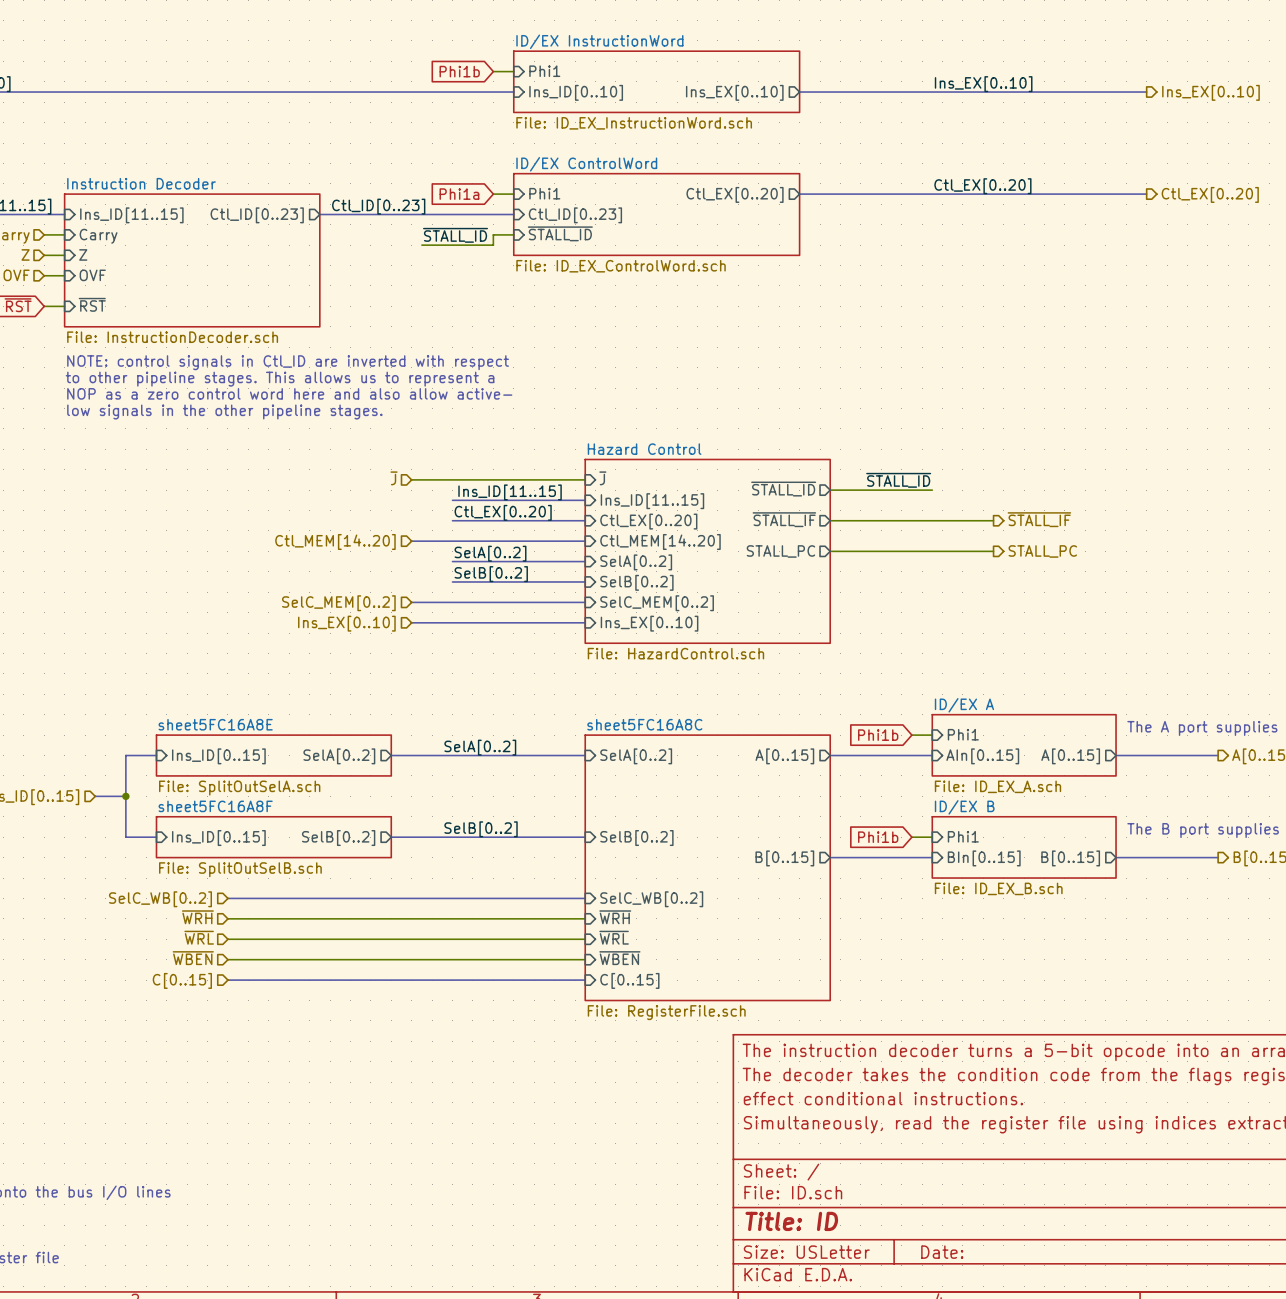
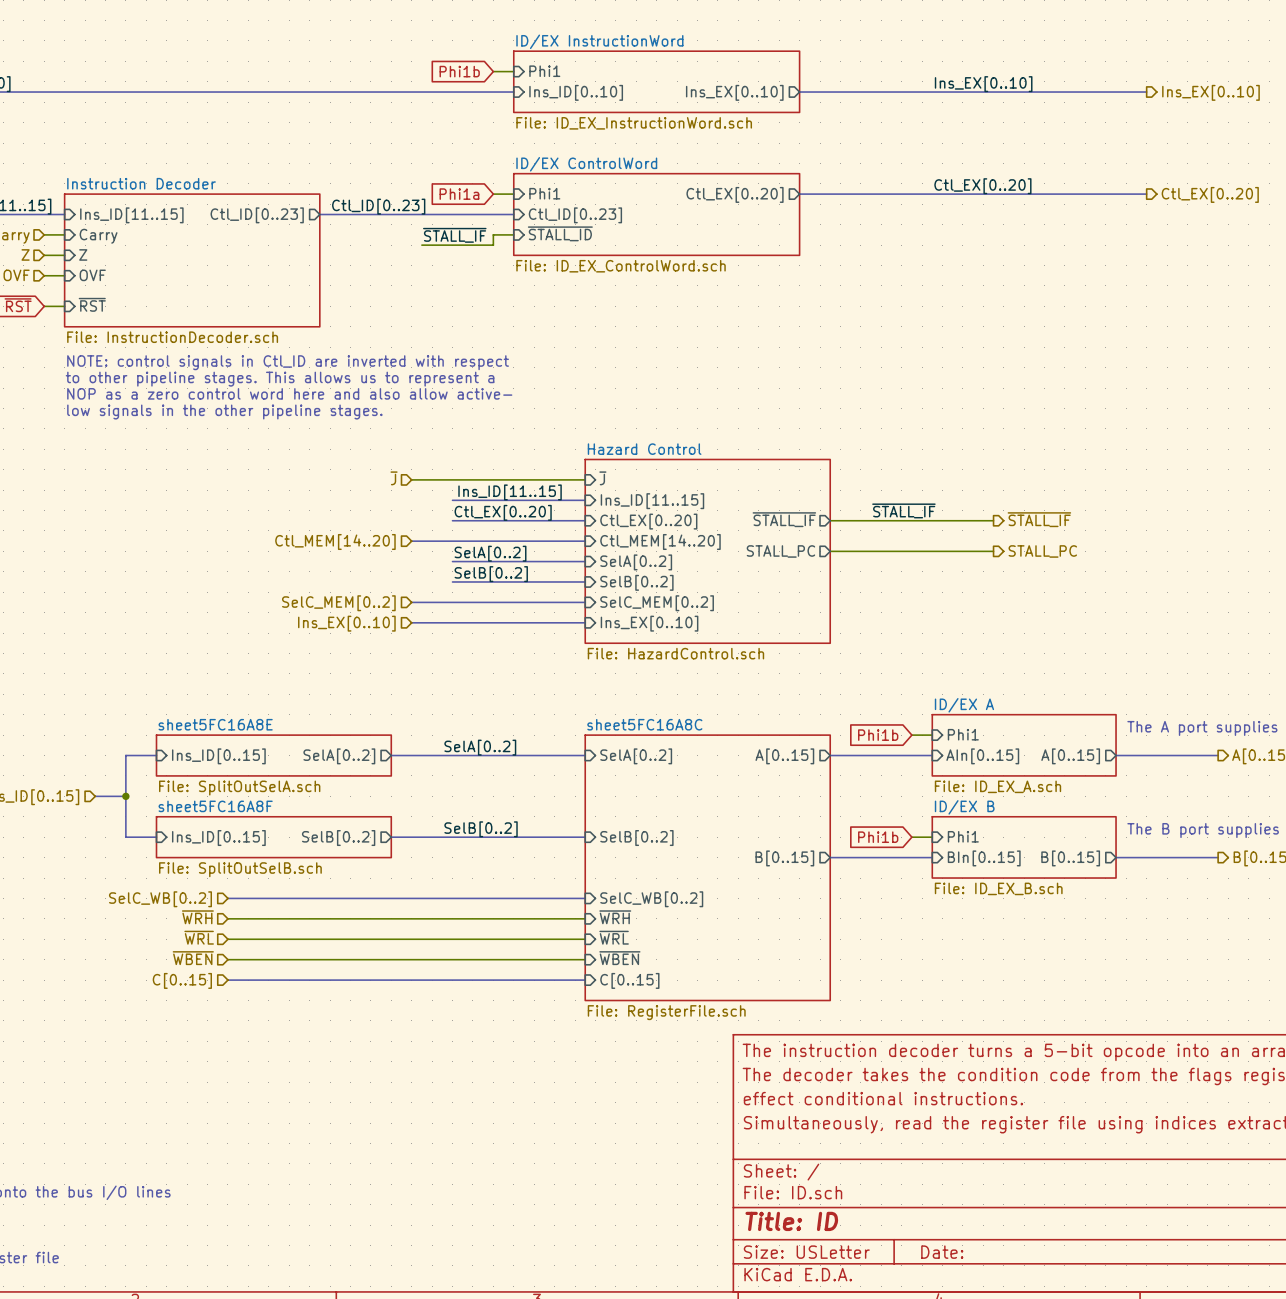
label: ~{STALL_ID} (455, 235) -> ~{STALL_IF} (454, 235)
label: ~{STALL_ID} (898, 480) -> none
sheet pin: ~{STALL_ID} (783, 489) -> none
wire: (830, 490) (932, 490) -> none
label: none -> ~{STALL_IF} (903, 510)

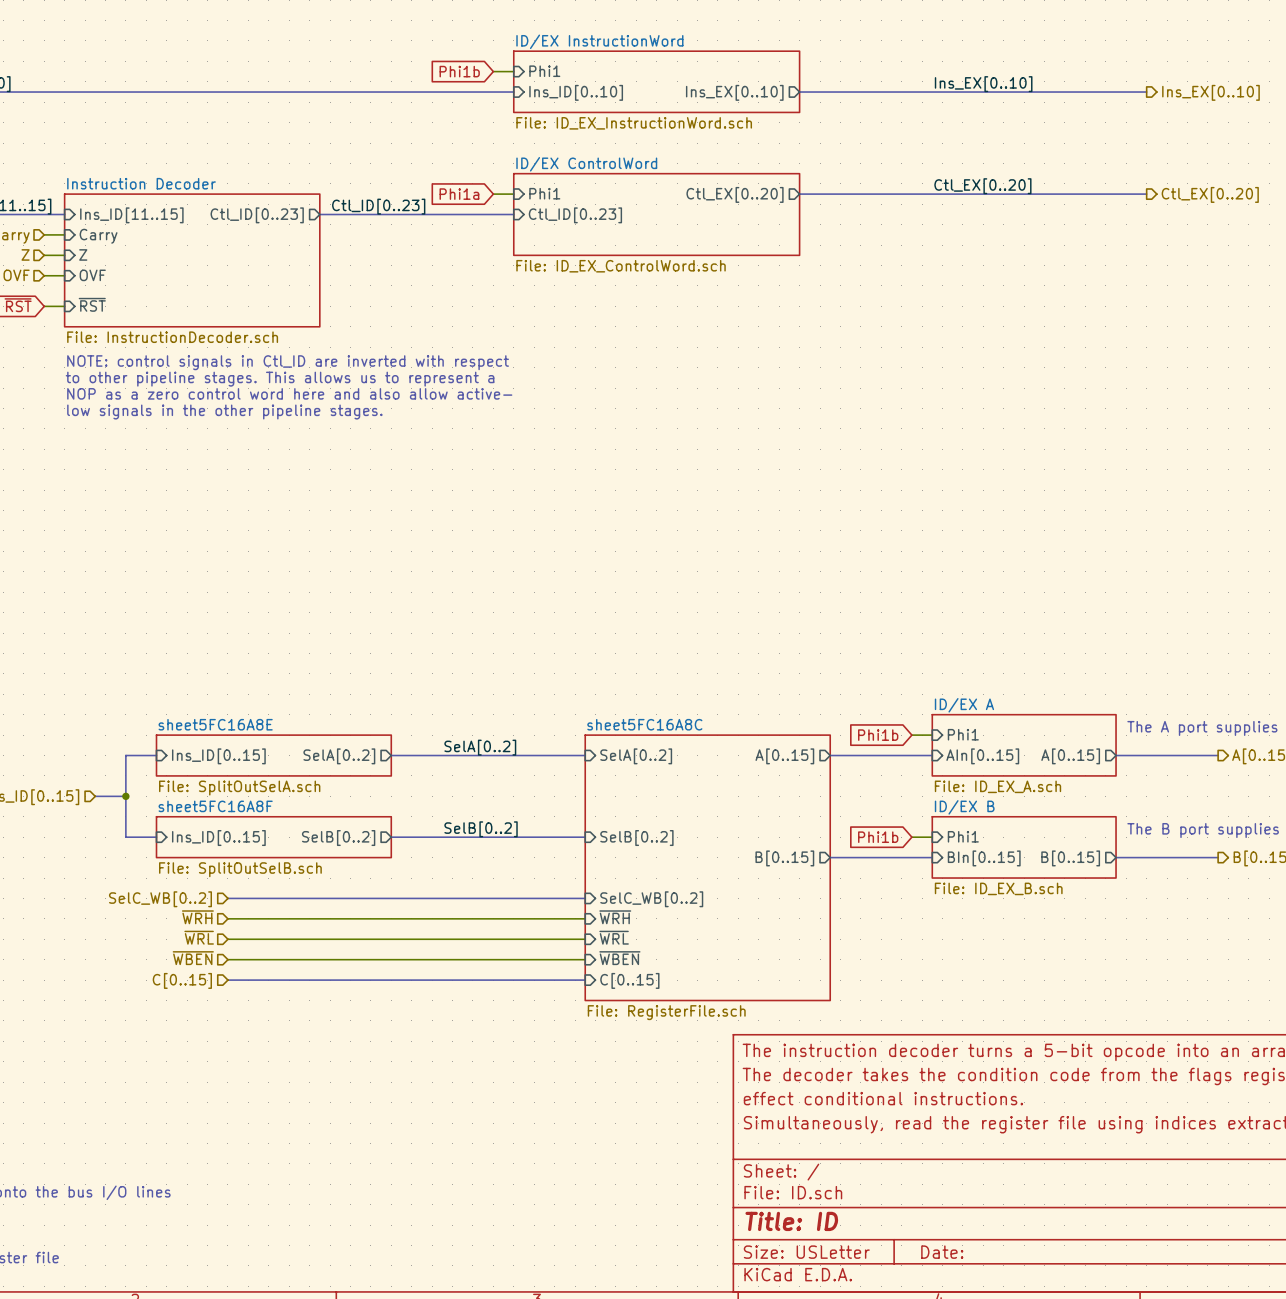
sheet pin: ~{STALL_ID} (560, 233) -> none
wire: (513, 234) (493, 234) (493, 245) (421, 245) -> none
label: ~{STALL_IF} (454, 235) -> none
hierarchical label: ~{J} (394, 478) -> none
sheet pin: ~{J} (602, 478) -> none
wire: (411, 479) (585, 479) -> none
label: Ins_ID[11..15] (510, 492) -> none
bus: (452, 500) (585, 500) -> none
sheet pin: Ins_ID[11..15] (652, 501) -> none
label: ~{STALL_IF} (903, 510) -> none
label: Ctl_EX[0..20] (503, 512) -> none
sheet pin: ~{STALL_IF} (784, 519) -> none
hierarchical label: ~{STALL_IF} (1039, 519) -> none
bus: (452, 520) (585, 520) -> none
wire: (830, 520) (993, 520) -> none
sheet pin: Ctl_EX[0..20] (648, 521) -> none
hierarchical label: Ctl_MEM[14..20] (335, 541) -> none
bus: (411, 541) (585, 541) -> none
sheet pin: Ctl_MEM[14..20] (660, 541) -> none
sheet Hazard Control: File: HazardControl.sch (707, 551) -> none
sheet pin: STALL_PC (780, 551) -> none
wire: (830, 551) (993, 551) -> none
hierarchical label: STALL_PC (1042, 551) -> none
label: SelA[0..2] (490, 553) -> none
bus: (452, 561) (585, 561) -> none
sheet pin: SelA[0..2] (636, 562) -> none
label: SelB[0..2] (491, 574) -> none
bus: (452, 581) (585, 581) -> none
sheet pin: SelB[0..2] (636, 582) -> none
bus: (411, 602) (585, 602) -> none
hierarchical label: SelC_MEM[0..2] (338, 603) -> none
sheet pin: SelC_MEM[0..2] (657, 603) -> none
bus: (411, 622) (585, 622) -> none
hierarchical label: Ins_EX[0..10] (346, 623) -> none
sheet pin: Ins_EX[0..10] (649, 623) -> none

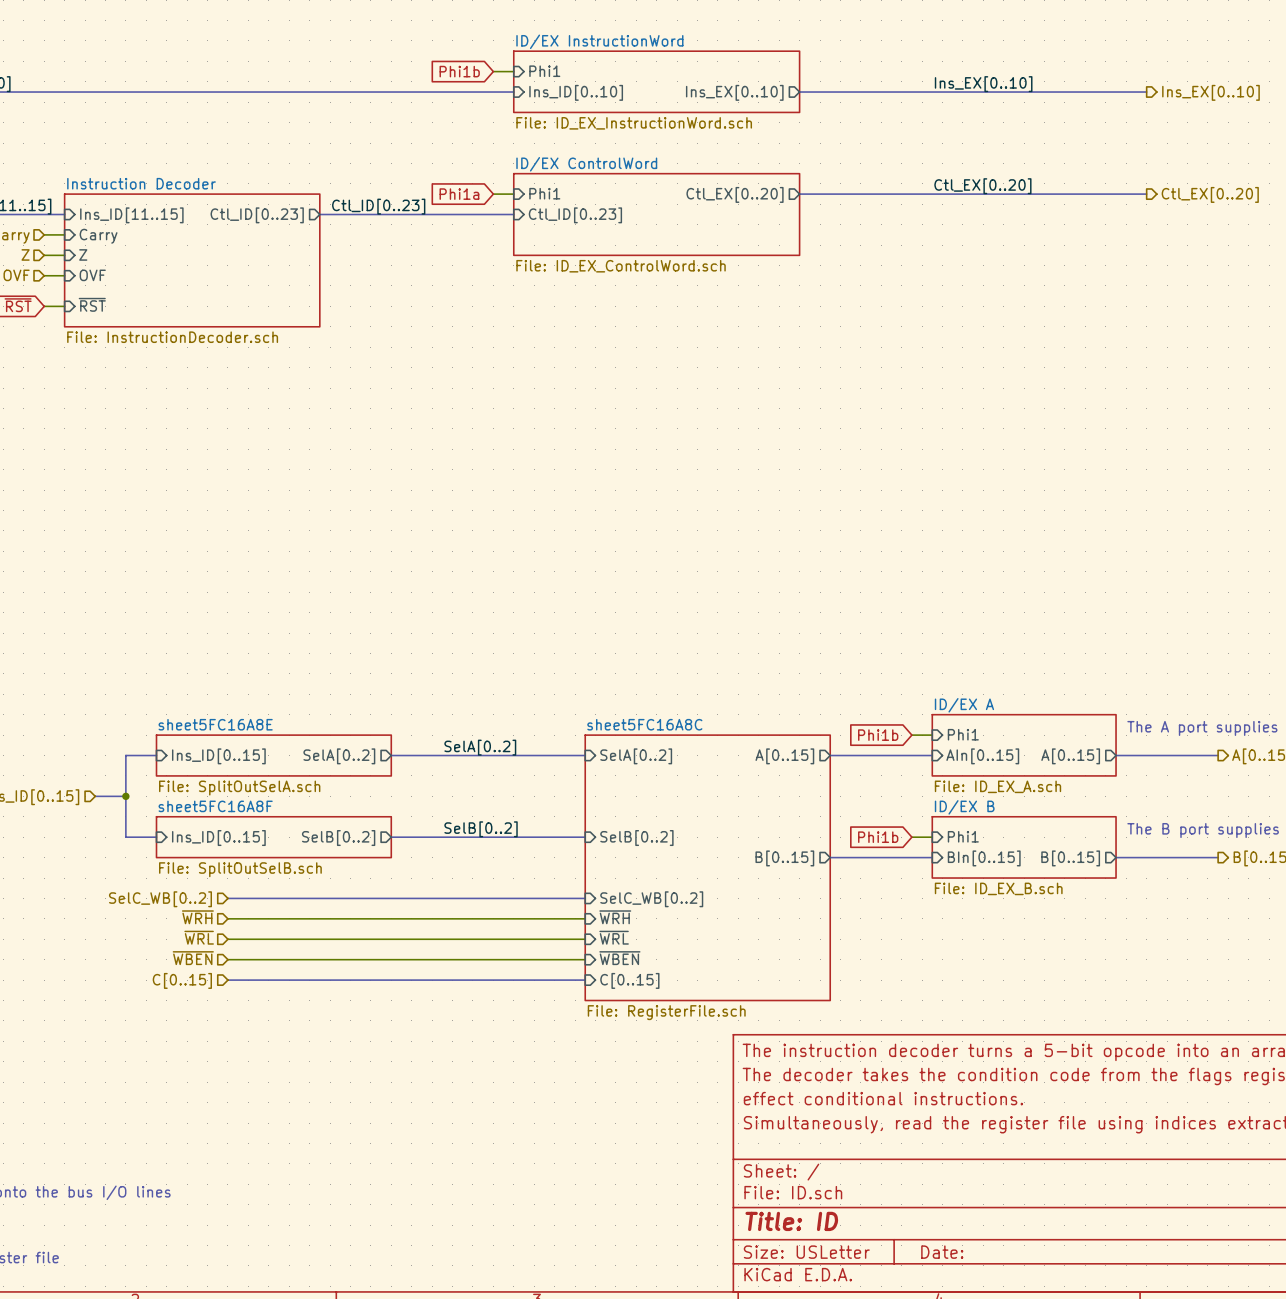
text: NOTE: control signals in Ctl_ID are inverted with respect (288, 362) -> none
text: to other pipeline stages. This allows us to represent a (280, 379) -> none
text: NOP as a zero control word here and also allow active- (289, 393) -> none
text: low signals in the other pipeline stages. (224, 412) -> none

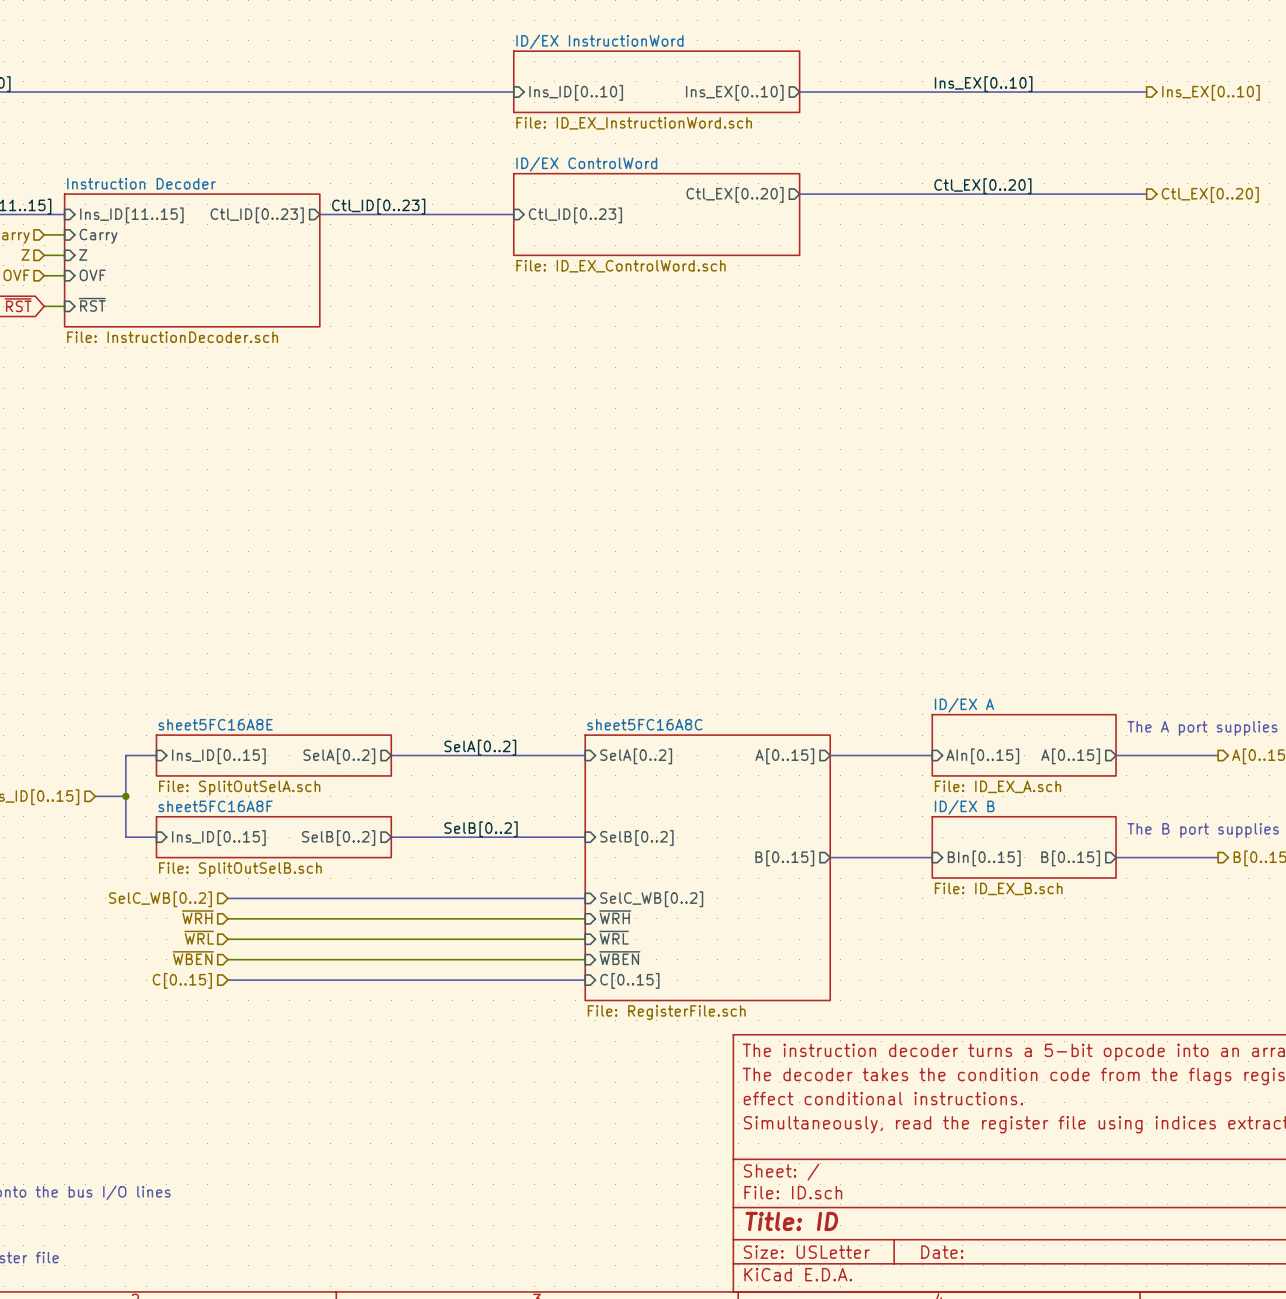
global label: Phi1b (459, 71) -> none
wire: (493, 71) (513, 71) -> none
sheet pin: Phi1 (544, 71) -> none
sheet pin: Phi1 (544, 193) -> none
global label: Phi1a (459, 194) -> none
wire: (493, 194) (513, 194) -> none
sheet pin: Phi1 (963, 734) -> none
global label: Phi1b (878, 735) -> none
wire: (911, 735) (932, 735) -> none
sheet pin: Phi1 (963, 836) -> none
global label: Phi1b (878, 837) -> none
wire: (911, 837) (932, 837) -> none

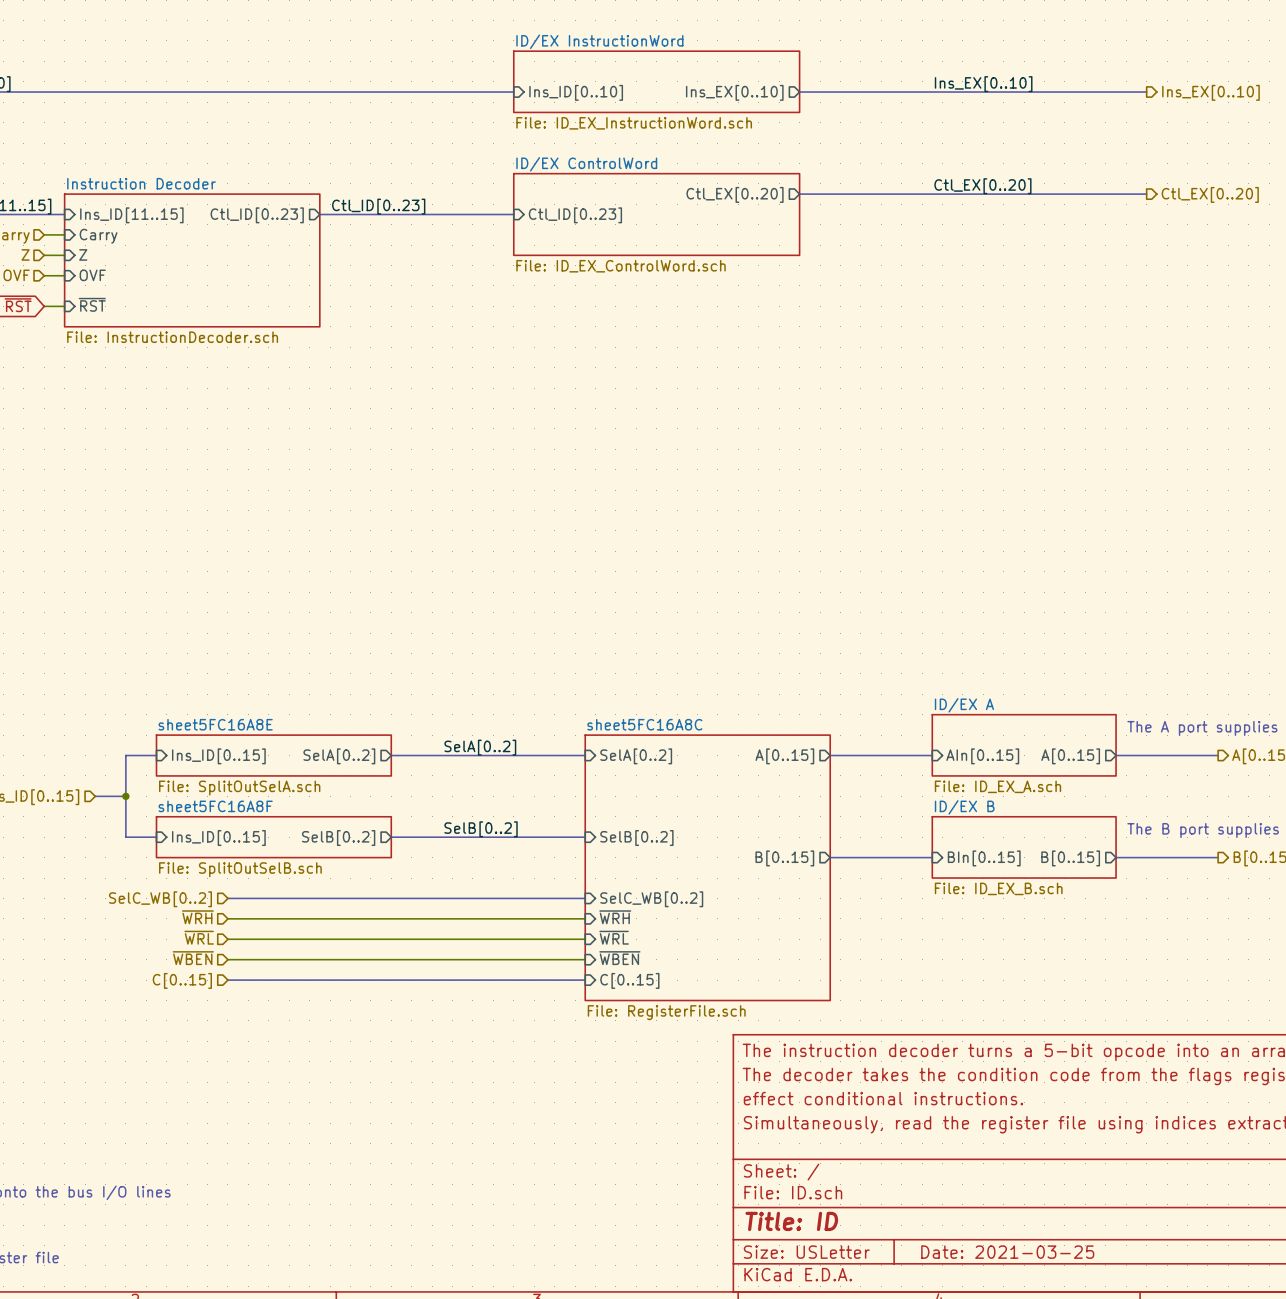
title block: Date: (942, 1252) -> Date: 2021-03-25 (1007, 1252)

